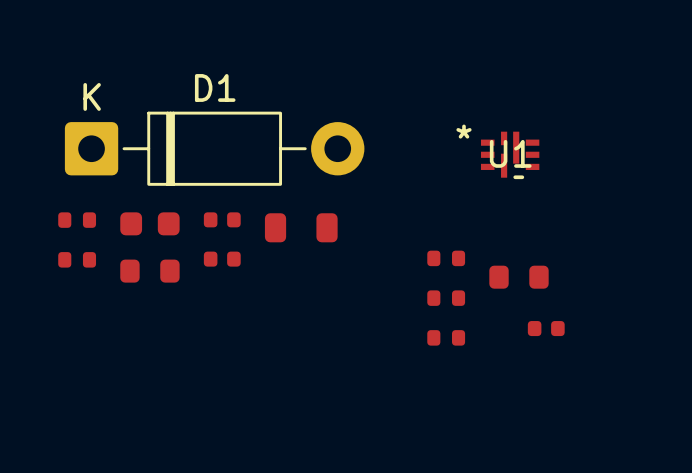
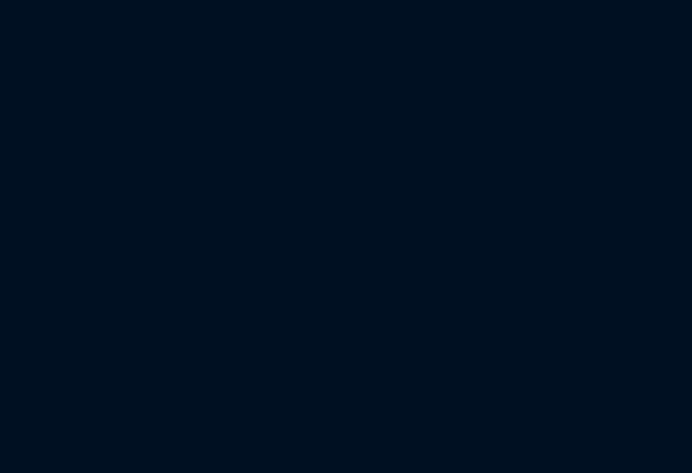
D1: (214, 148) -> none
U1: (510, 155) -> none
part: (222, 219) -> none
part: (77, 220) -> none
part: (149, 223) -> none
part: (301, 227) -> none
part: (446, 258) -> none
part: (77, 259) -> none
part: (222, 259) -> none
part: (149, 271) -> none
part: (519, 277) -> none
part: (446, 298) -> none
part: (546, 328) -> none
part: (446, 337) -> none

